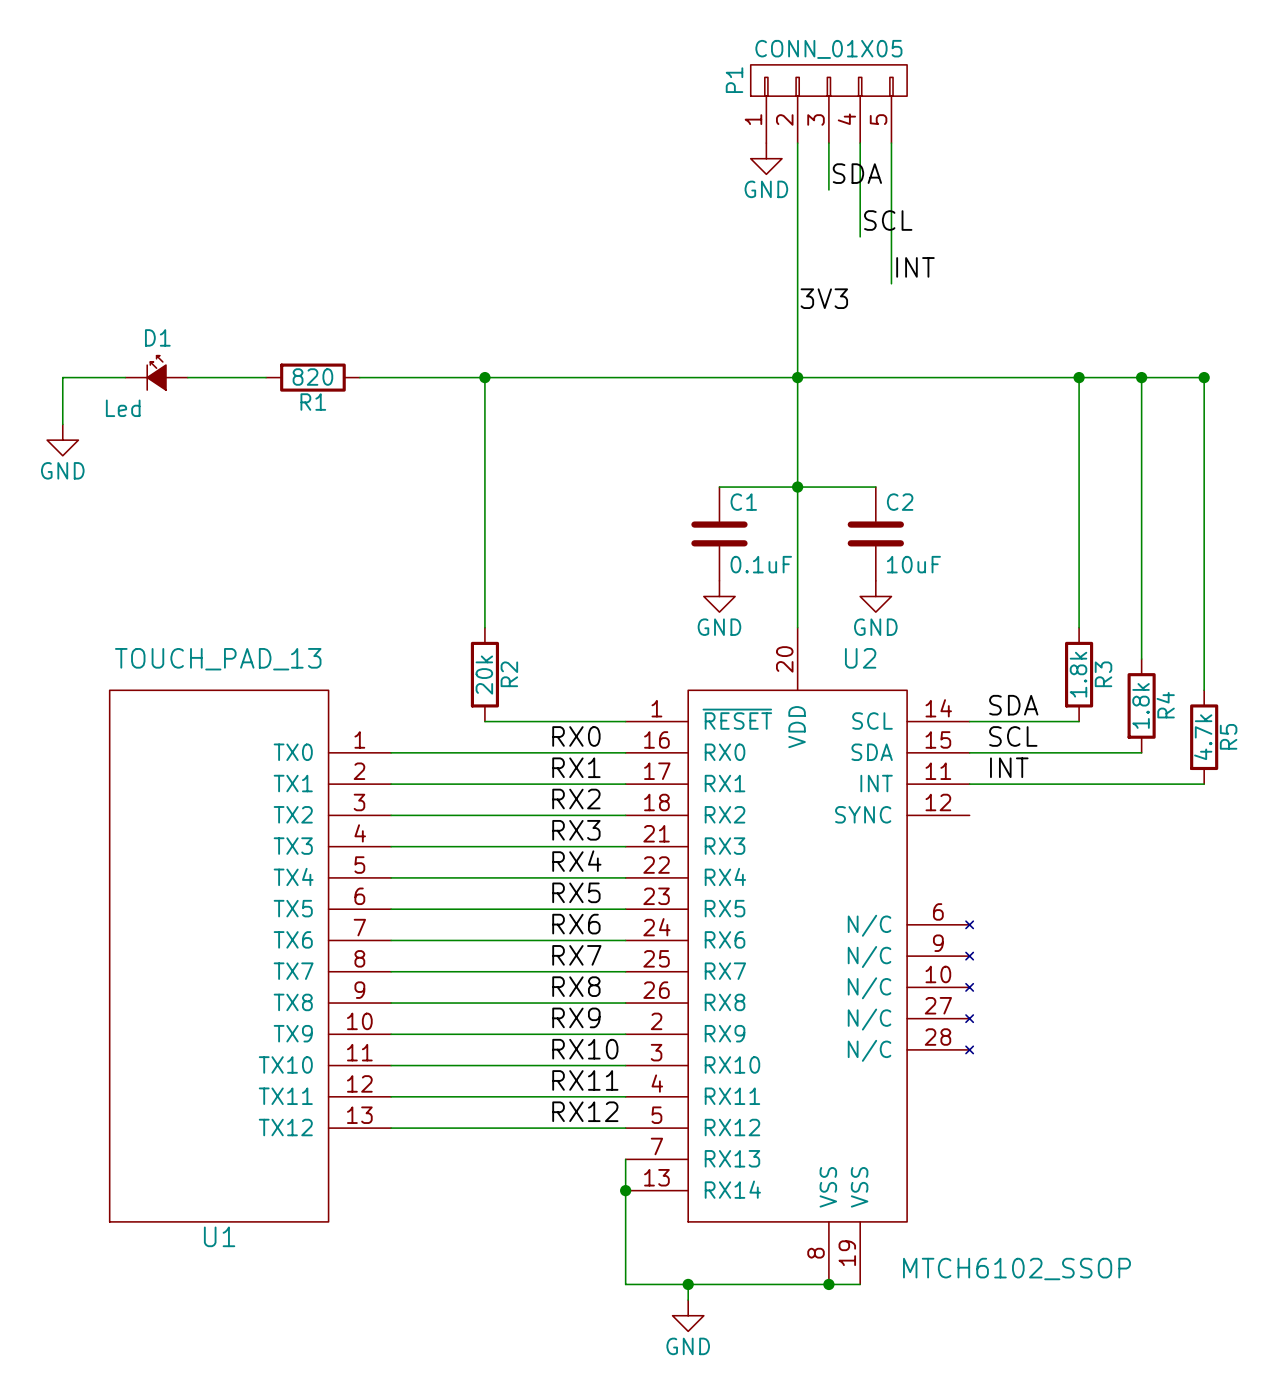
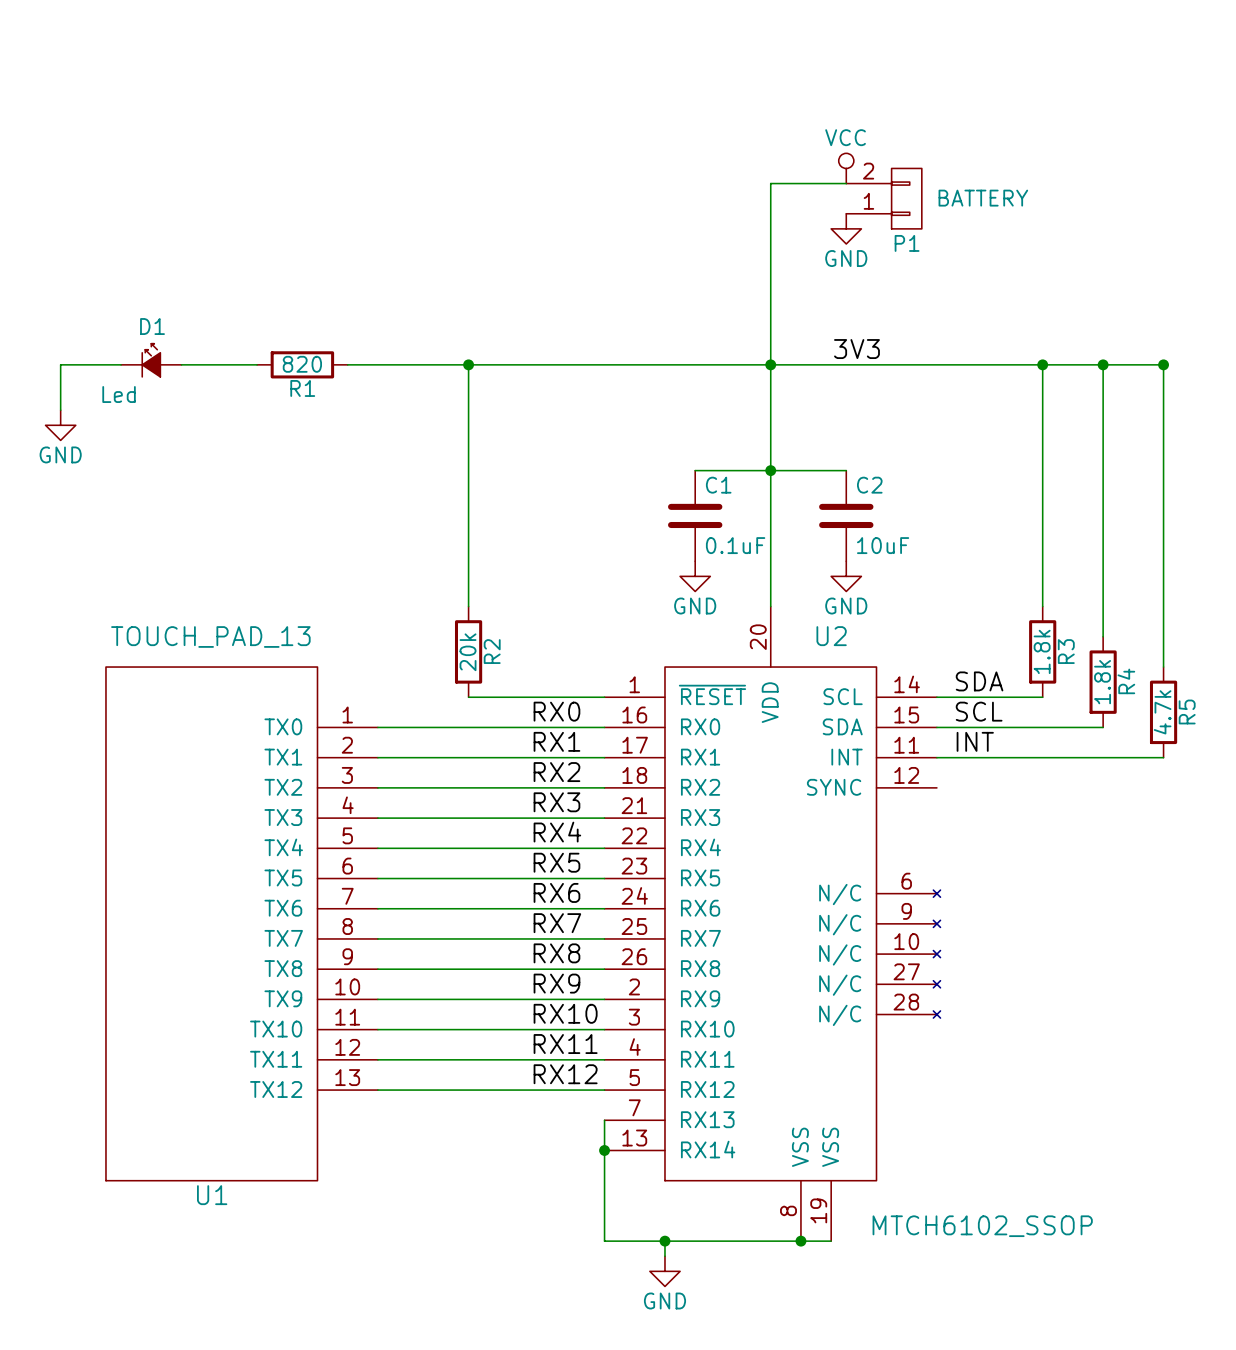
P1 value: CONN_01X05 (828, 49) -> BATTERY (983, 198)
P1 symbol: [750, 64, 908, 144] -> [846, 168, 922, 229]
P1 name position: P1 (734, 80) -> P1 (907, 243)
wire: (797, 143) (797, 189) -> (846, 183) (770, 183)
wire: (828, 143) (828, 189) -> none
wire: (860, 143) (860, 236) -> none
wire: (891, 143) (891, 283) -> none
power symbol position: GND (766, 158) -> GND (846, 228)
label: SDA (857, 173) -> none
power symbol: none -> VCC (846, 168)
label: SCL (888, 220) -> none
label: INT (915, 267) -> none
label position: 3V3 (824, 298) -> 3V3 (856, 349)

